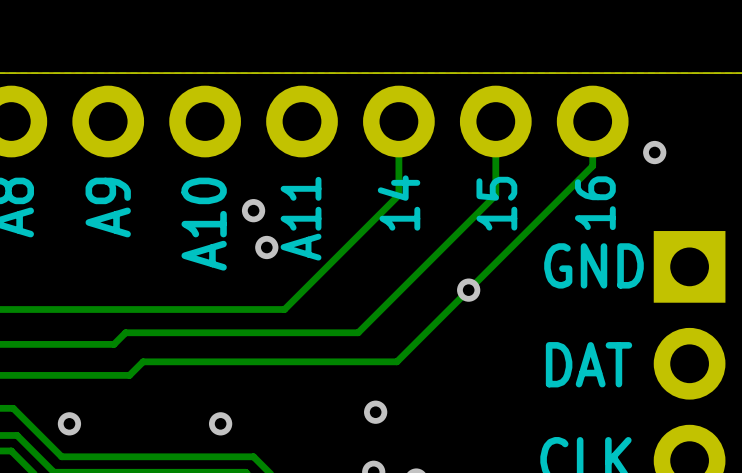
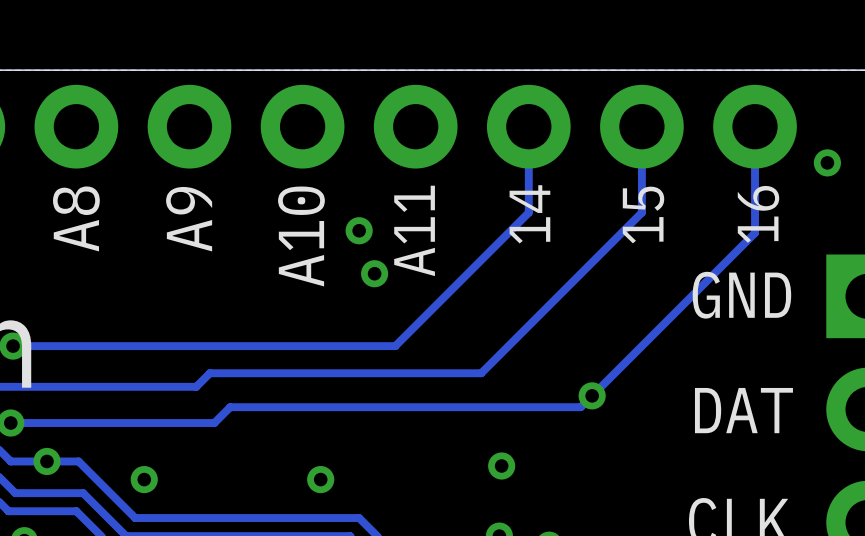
track: (592, 166) (396, 361) -> (755, 178) (755, 233) (580, 407) (526, 407)
via position: (468, 290) -> (592, 395)

